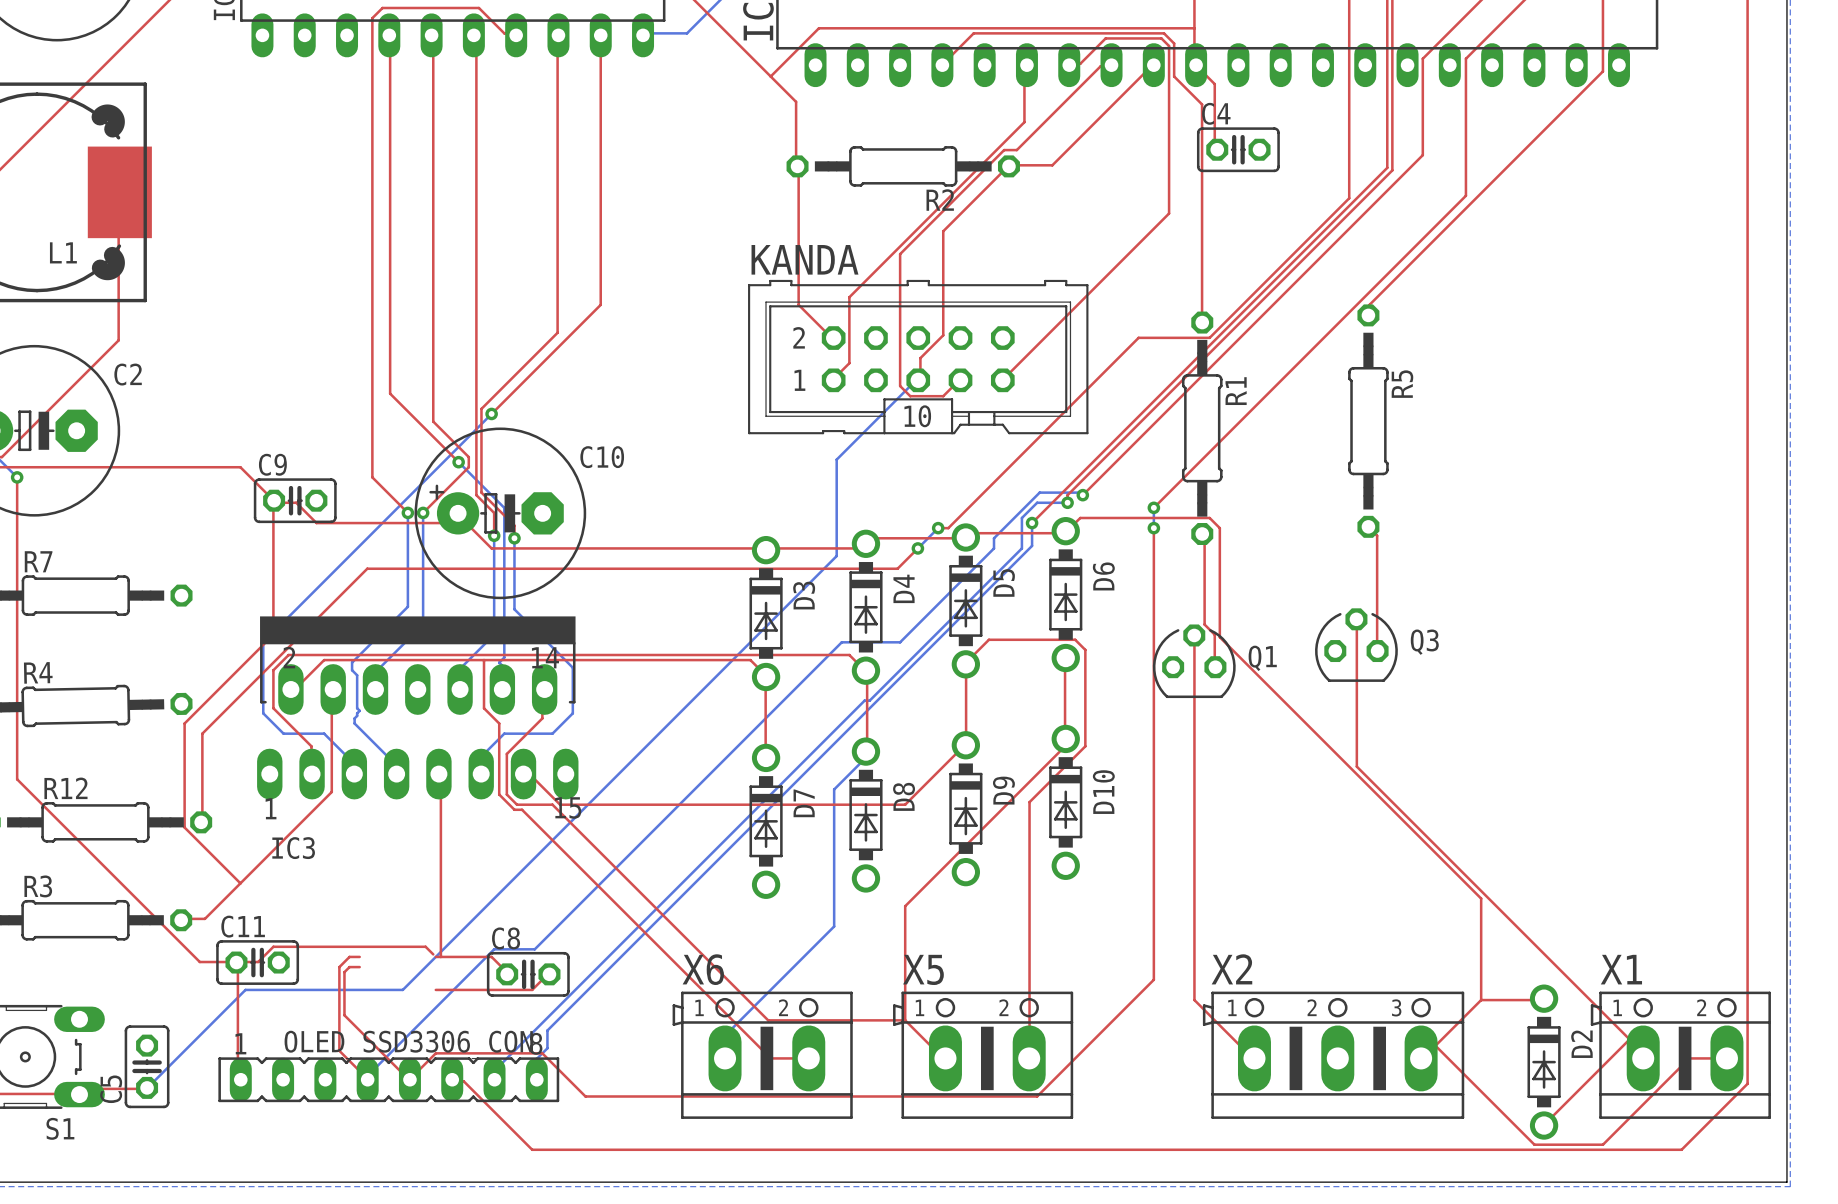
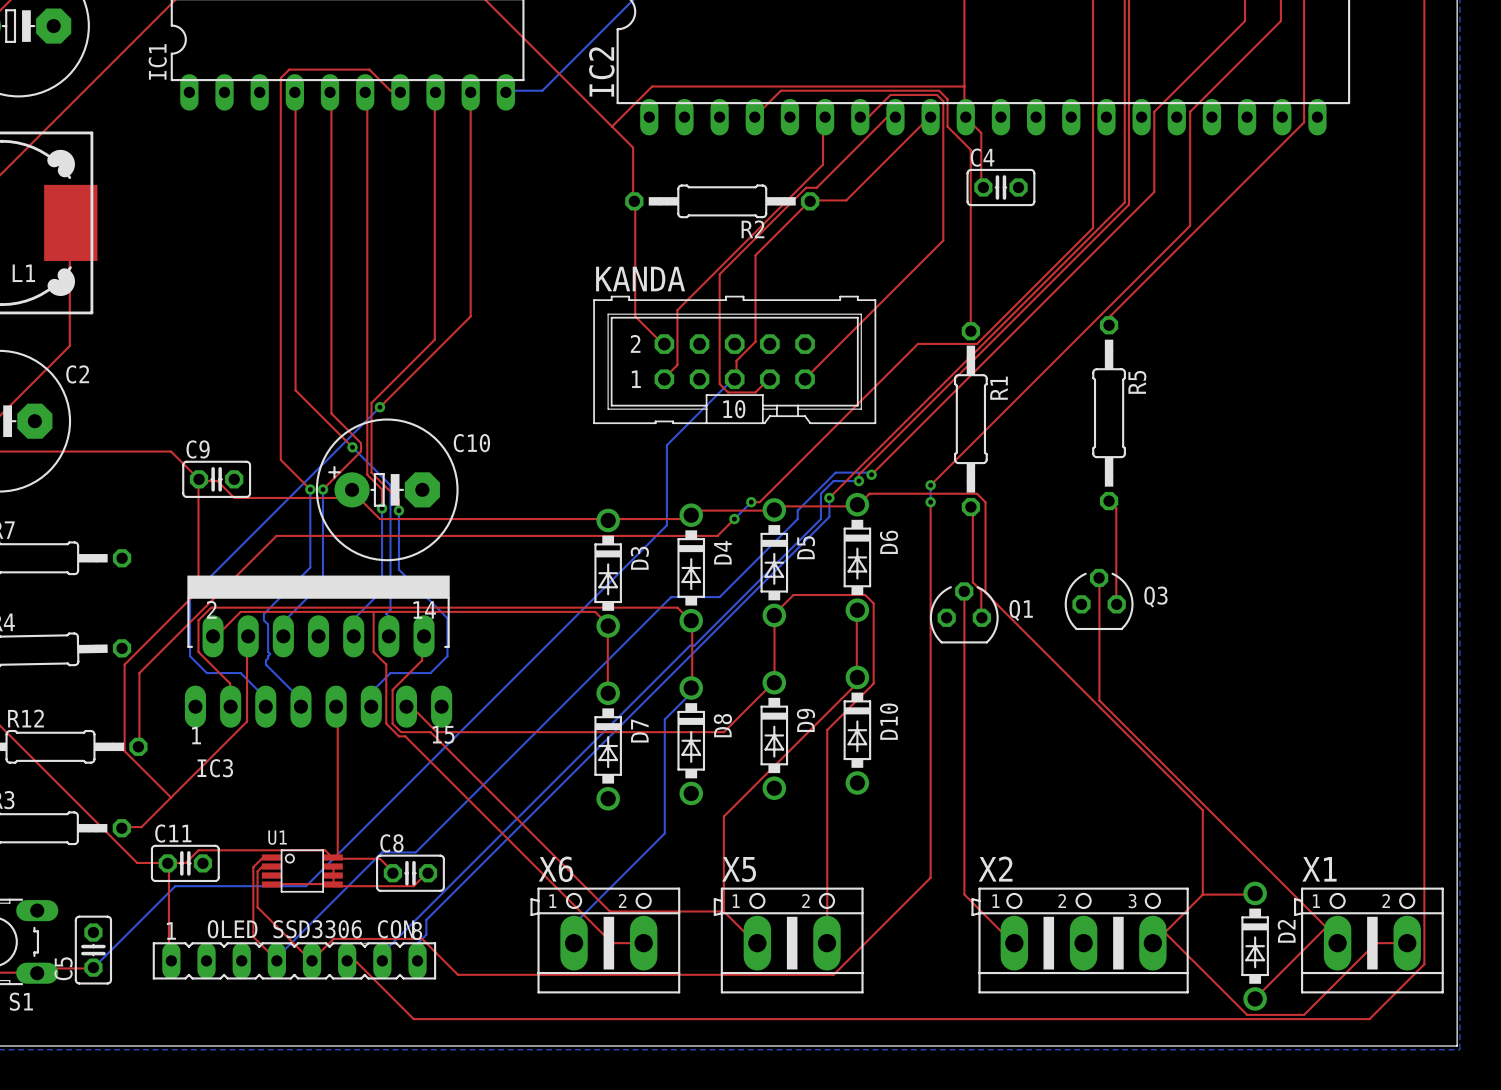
top track: none -> (332, 866) (332, 884) (271, 884)
U1: none -> (302, 871)

